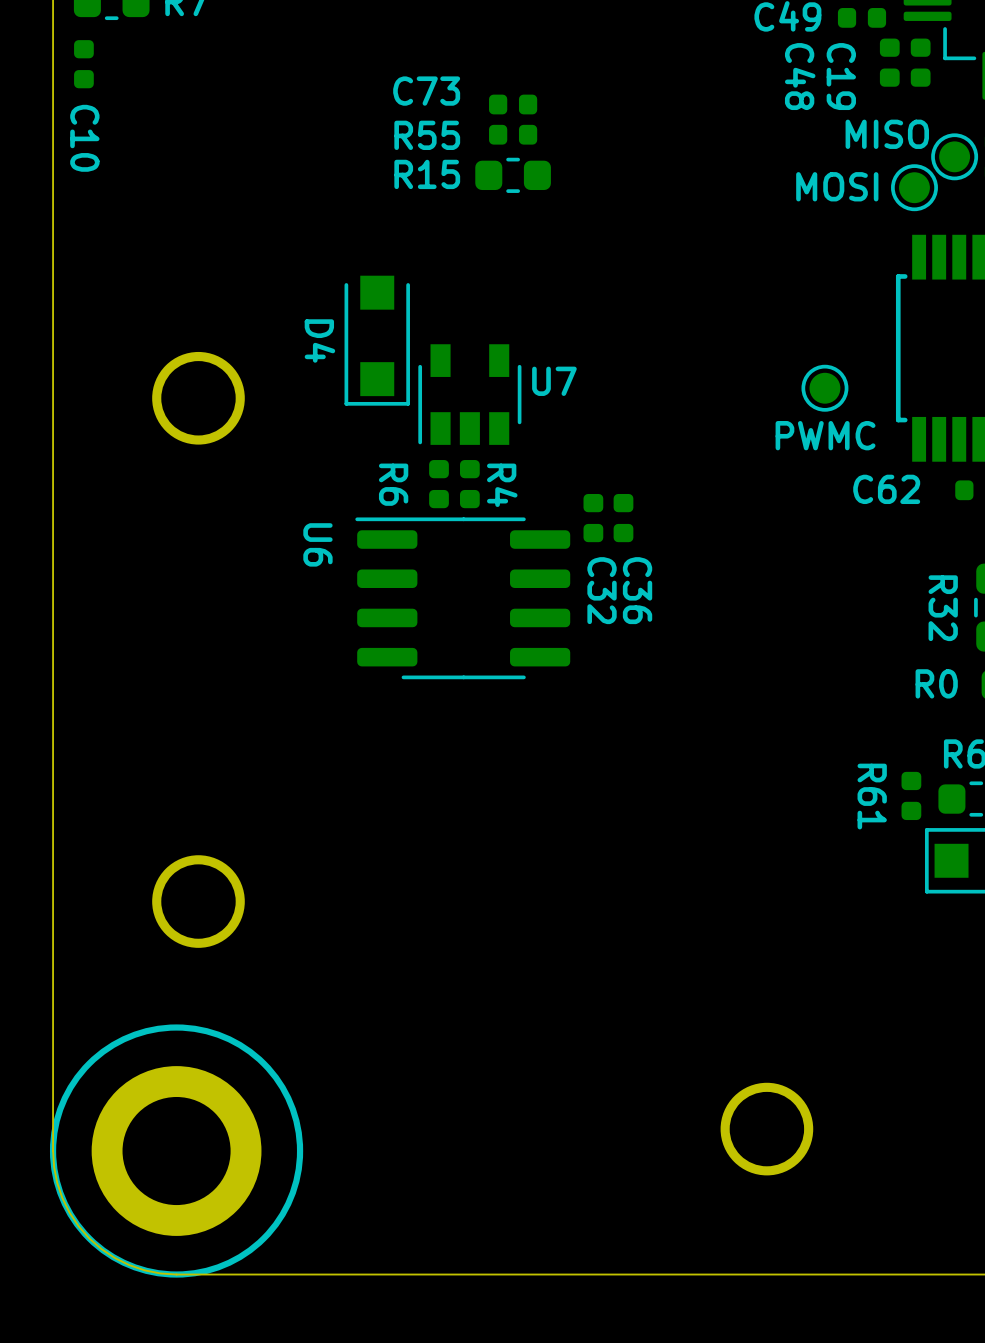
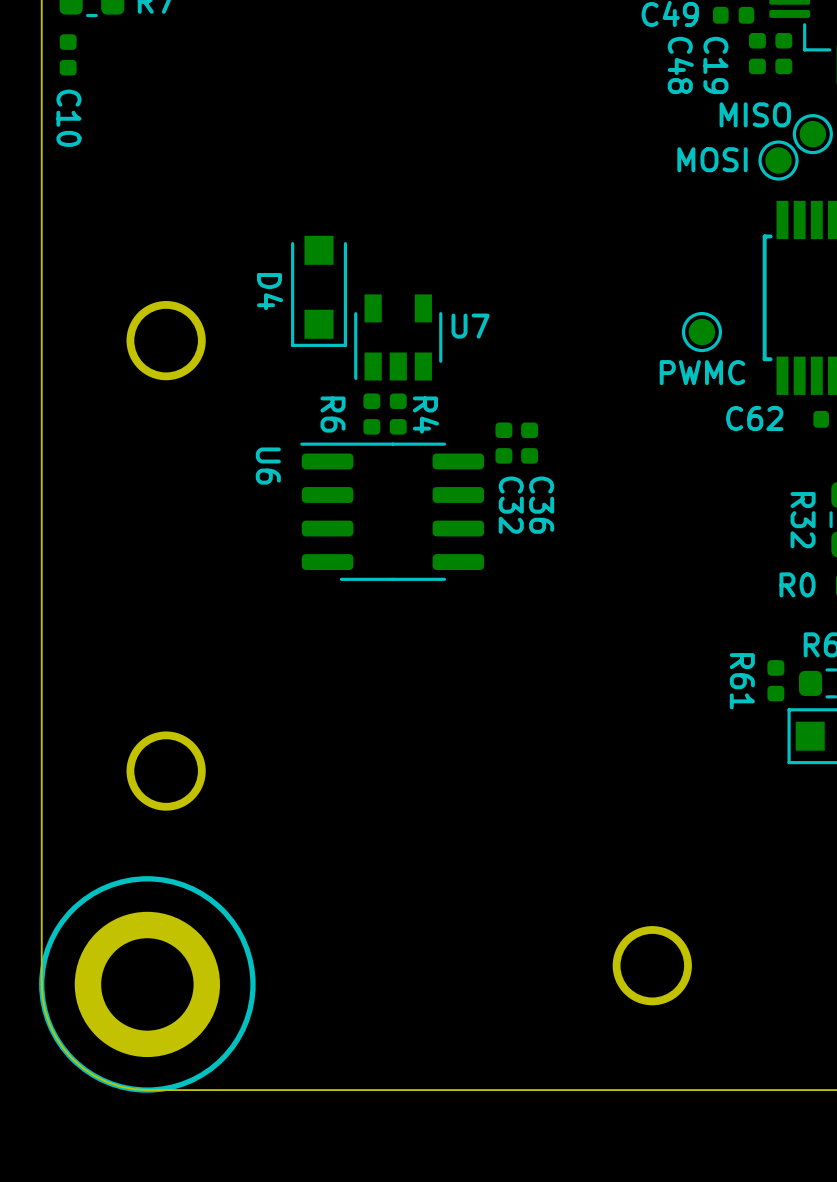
C73: (513, 104) -> none
R55: (513, 134) -> none
R15: (513, 175) -> none

